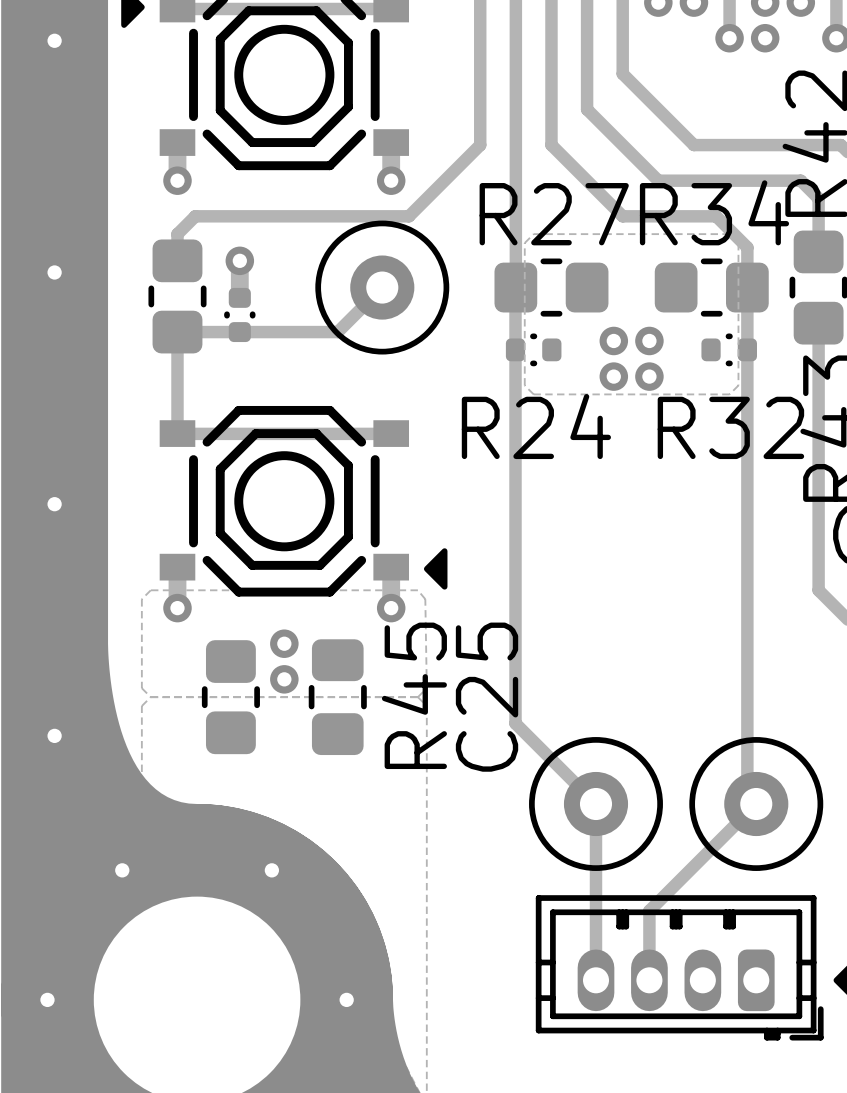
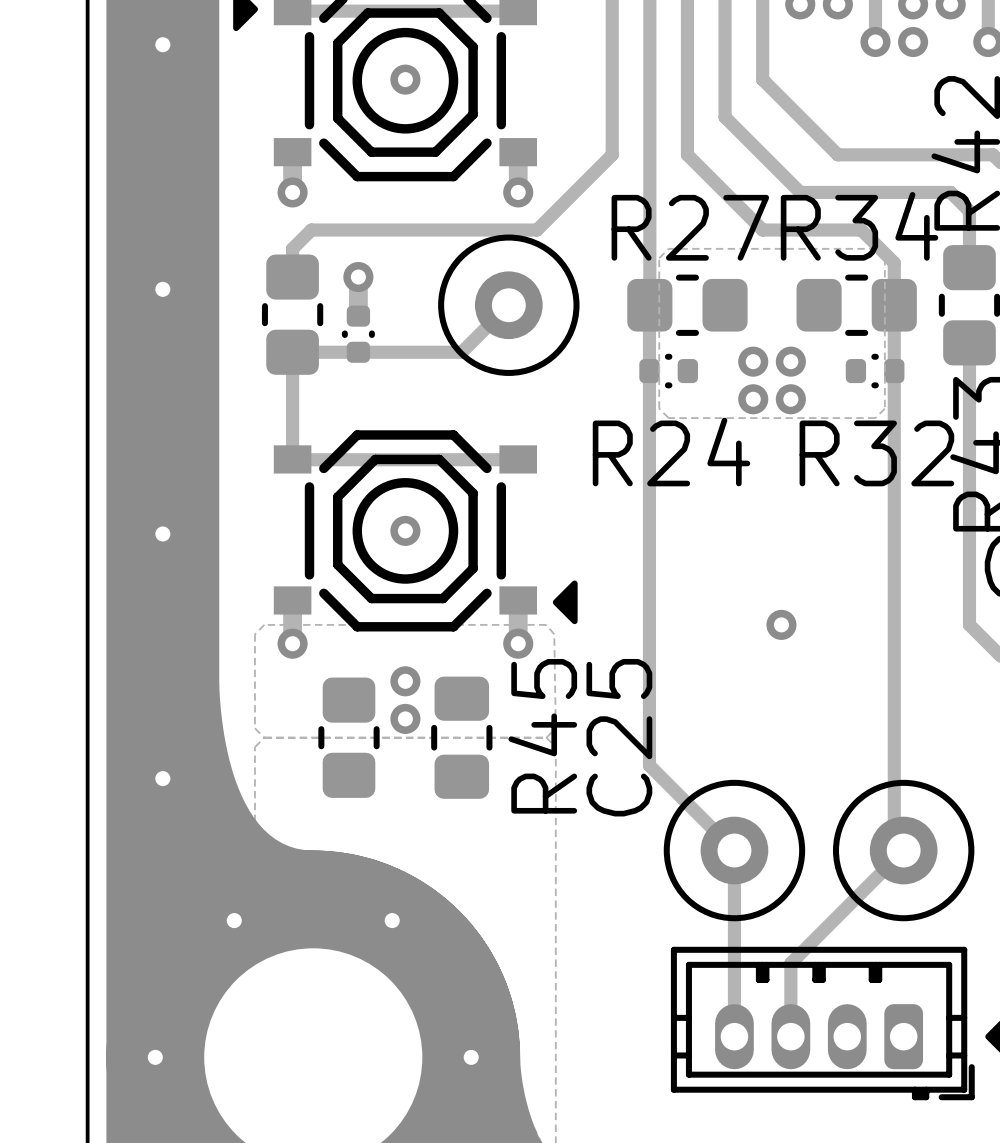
via: none -> (405, 79)
via: none -> (405, 530)
via: none -> (781, 624)

